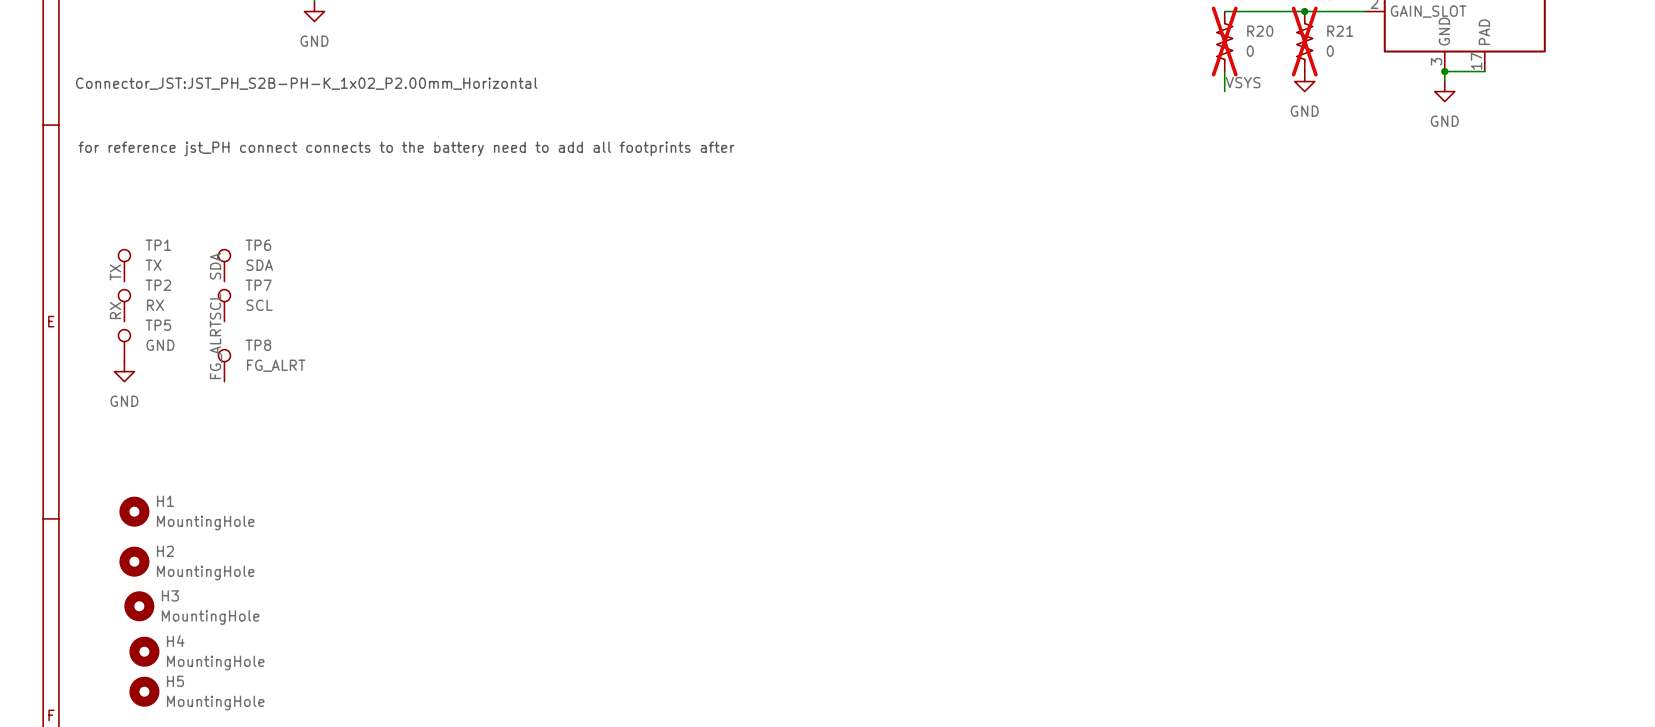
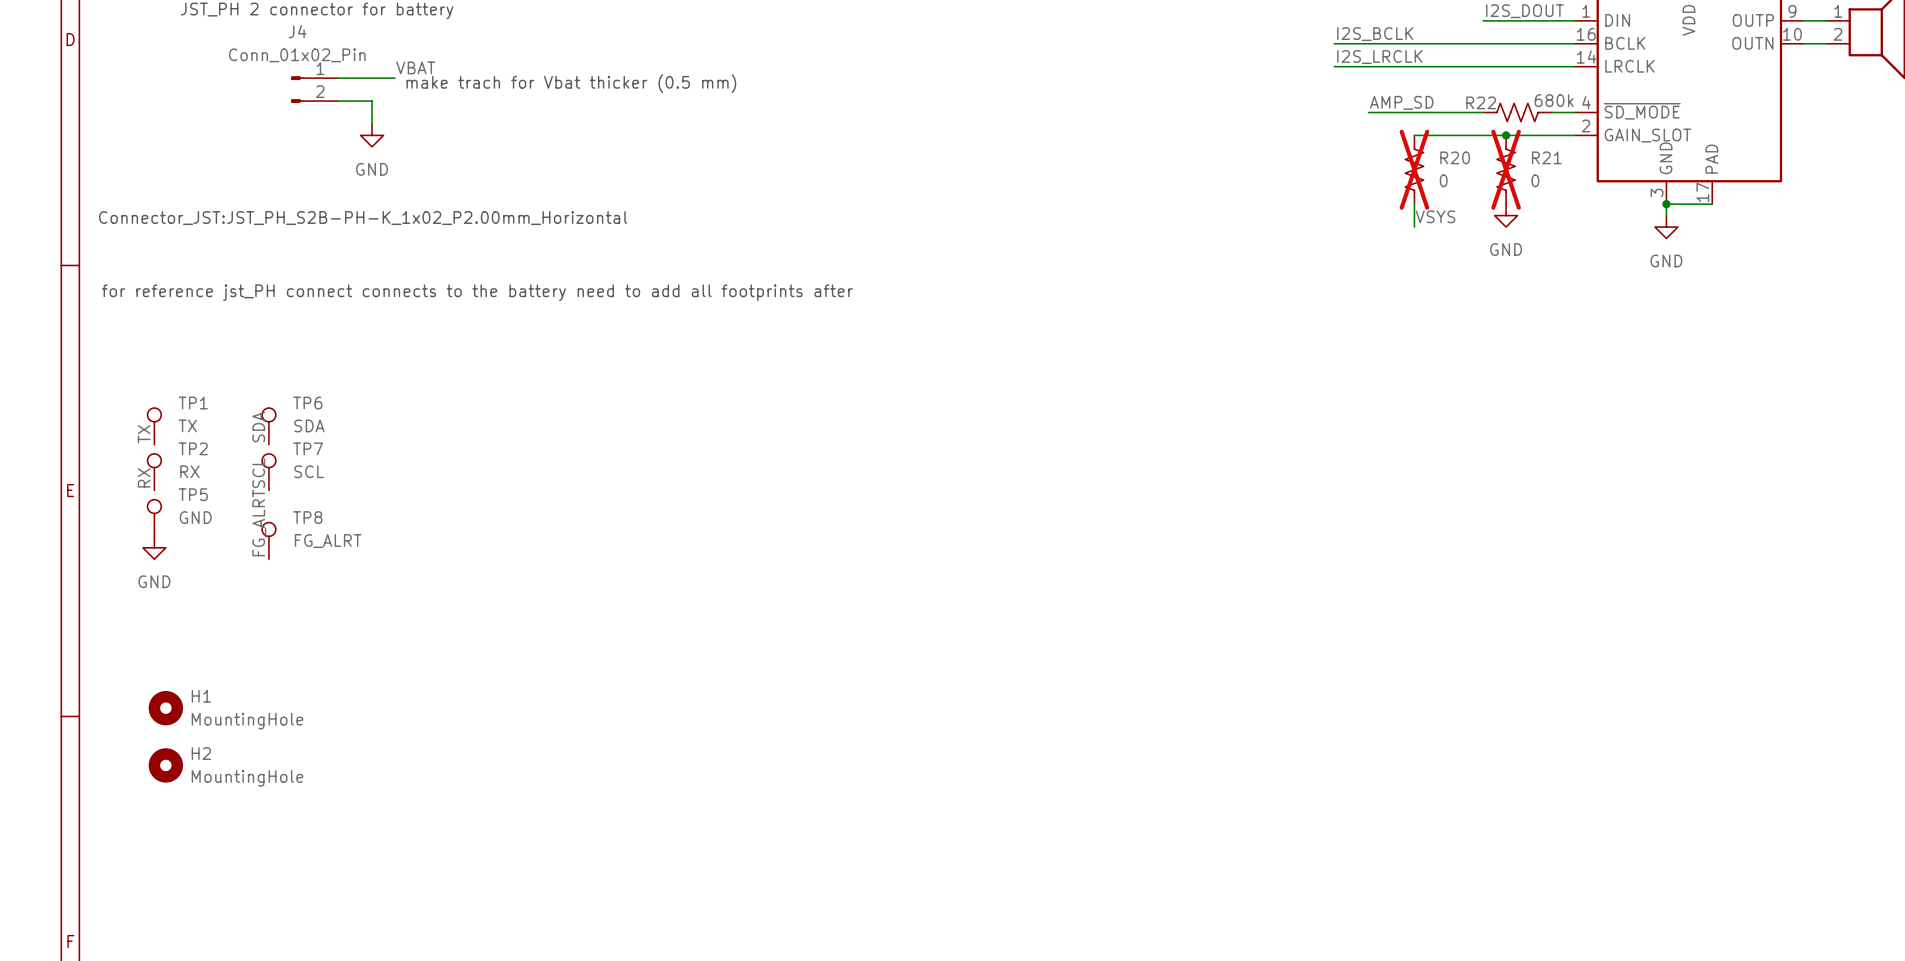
H3: MountingHole (139, 606) -> none
H4: MountingHole (144, 651) -> none
H5: MountingHole (144, 691) -> none

